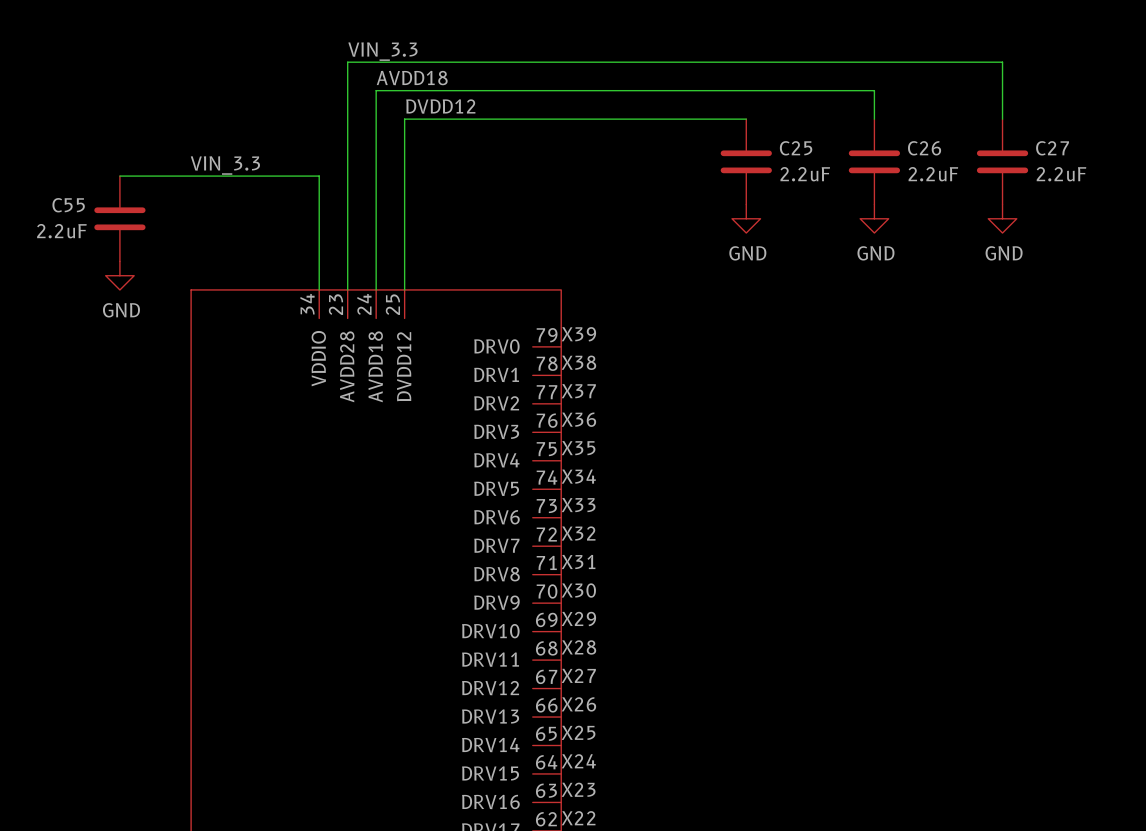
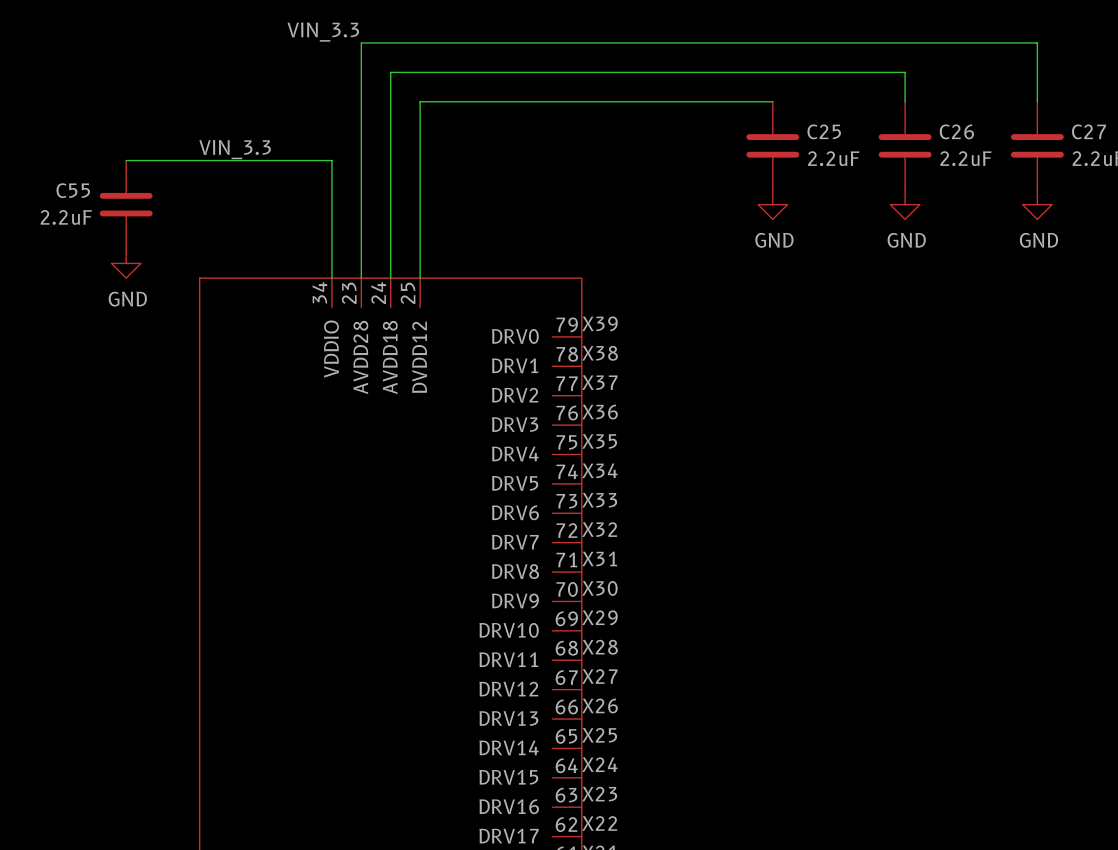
label position: VIN_3.3 (382, 51) -> VIN_3.3 (323, 32)
label: AVDD18 (412, 78) -> none
label: DVDD12 (440, 106) -> none

